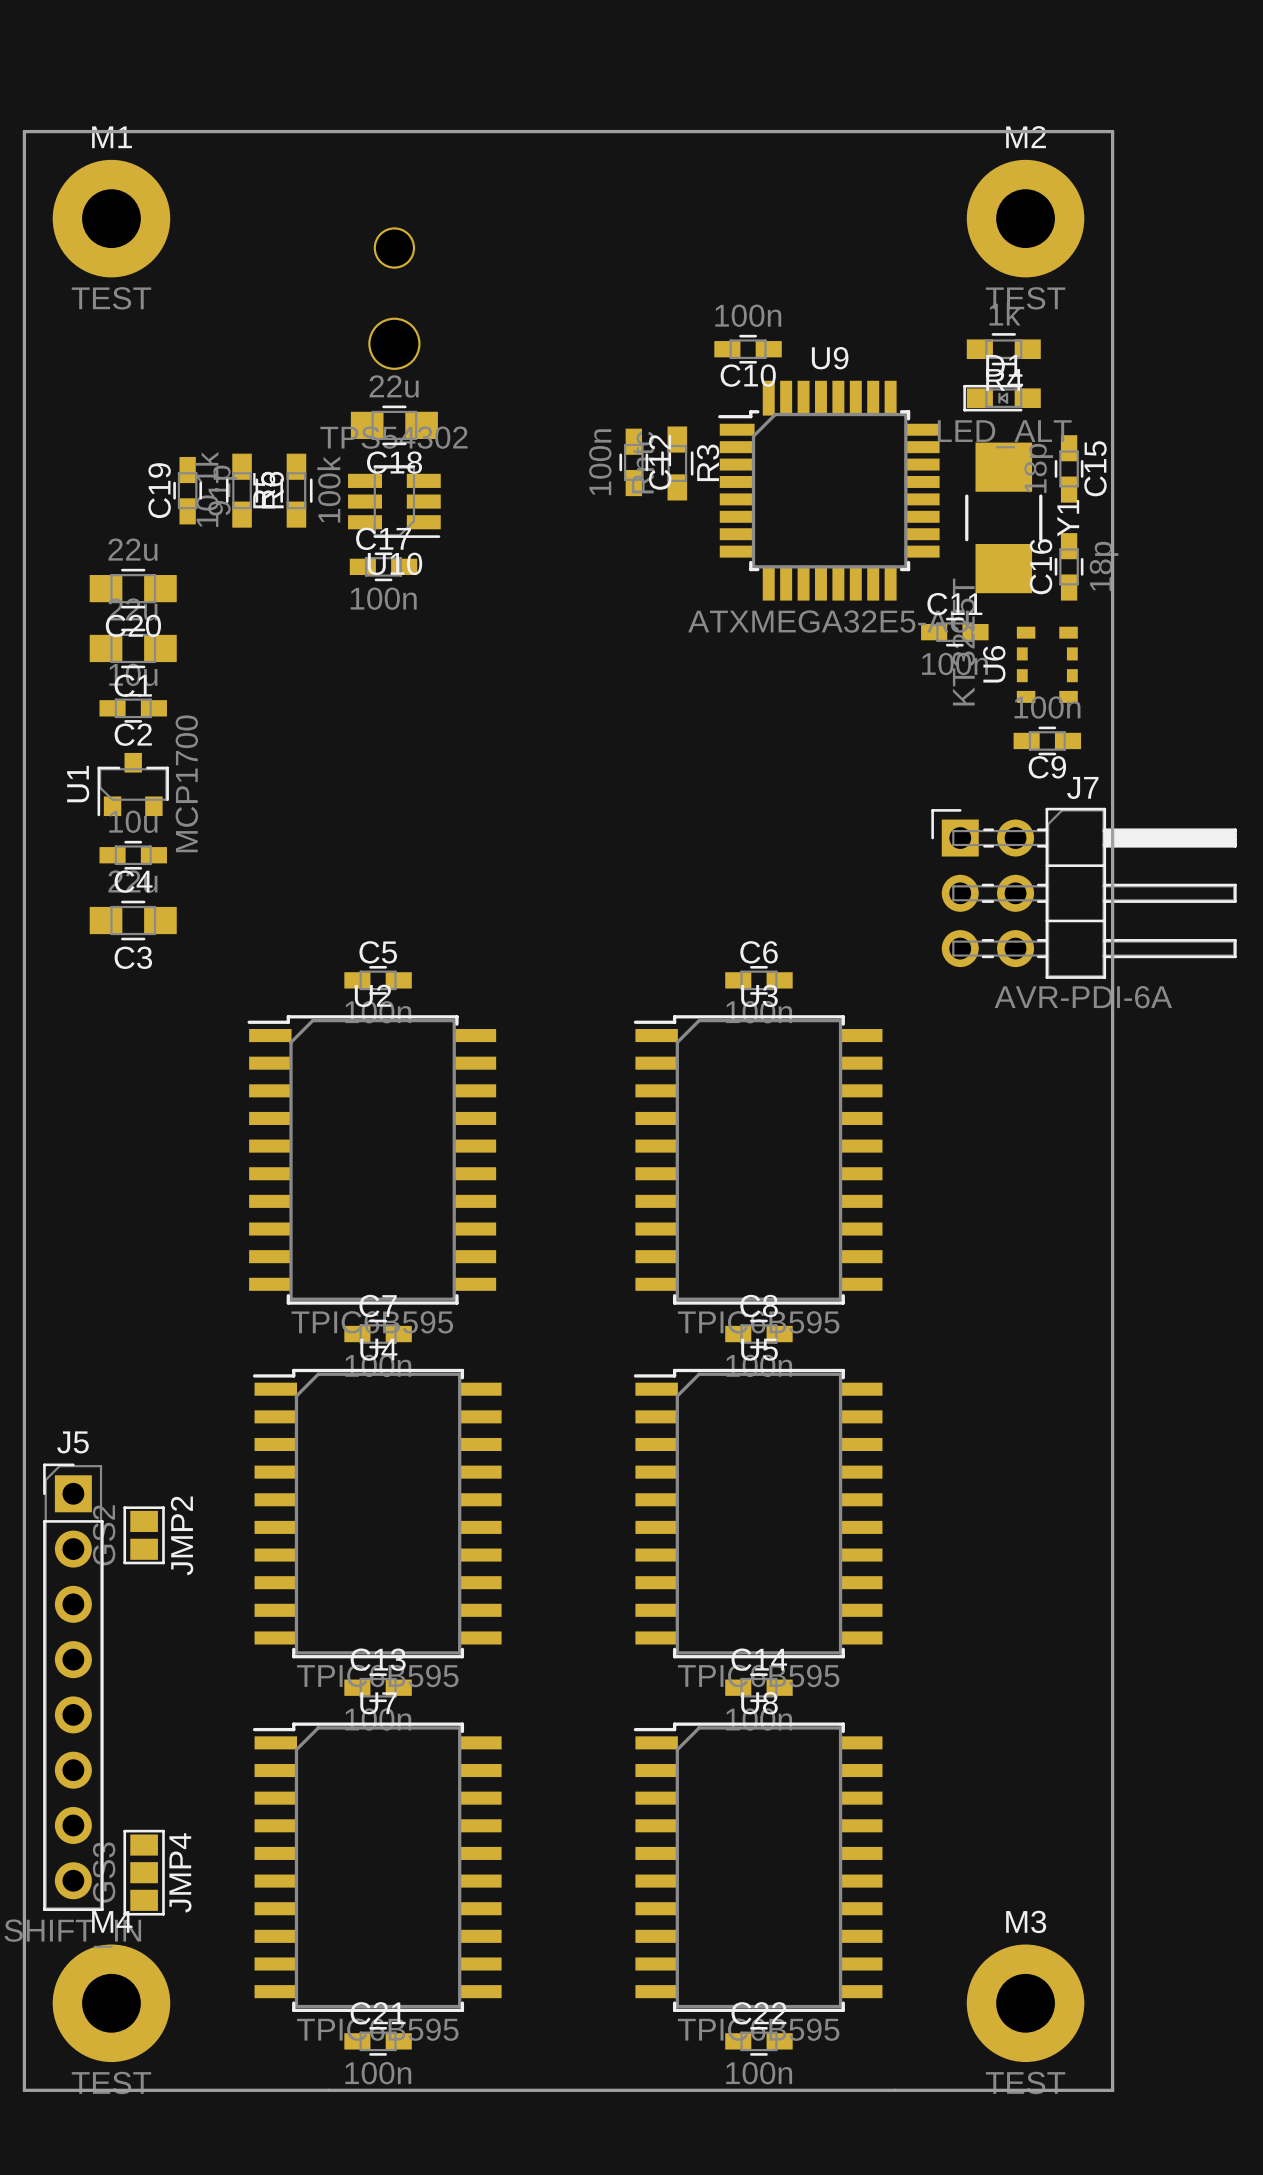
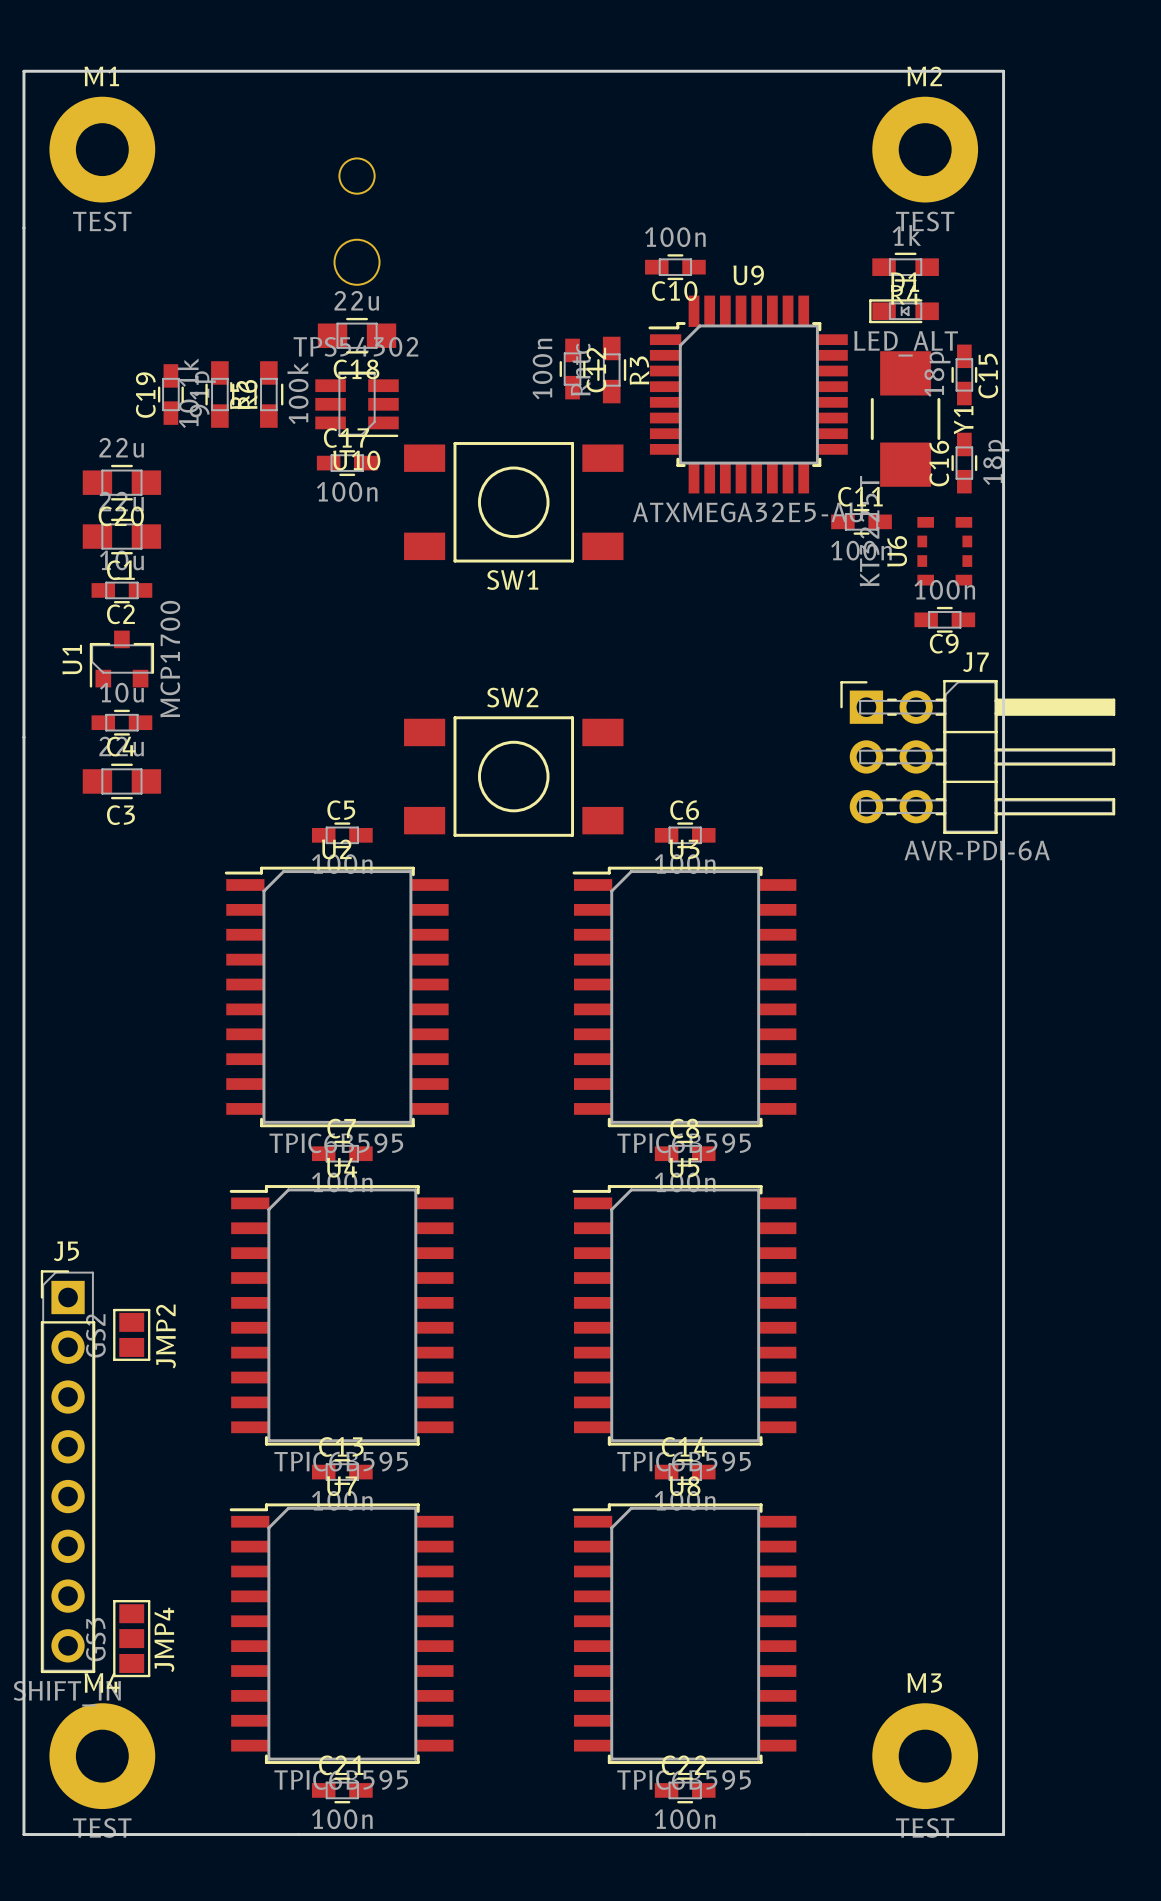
SW1: none -> (513, 502)
SW2: none -> (513, 776)

